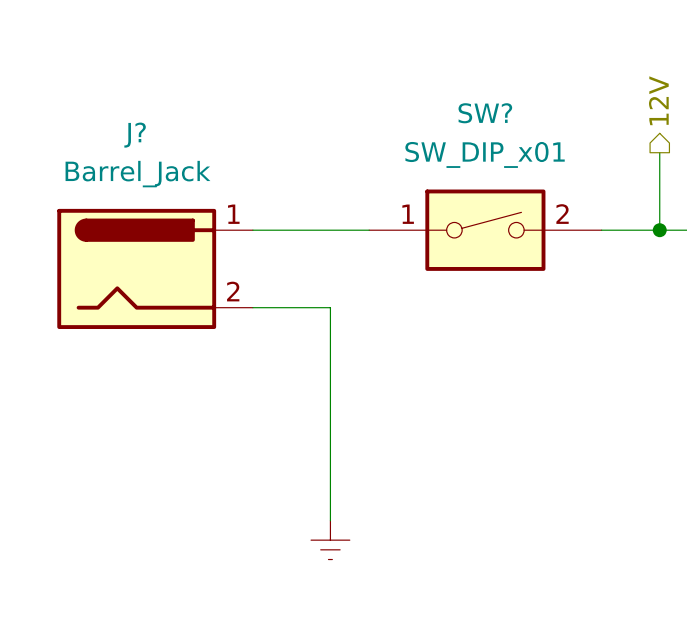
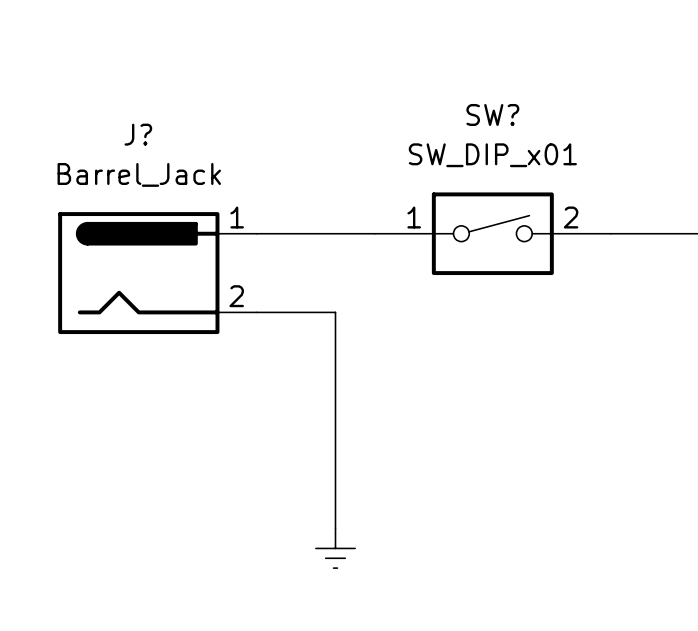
hierarchical label: 12V (658, 100) -> none
wire: (659, 152) (659, 230) -> none
junction: (659, 230) -> none

